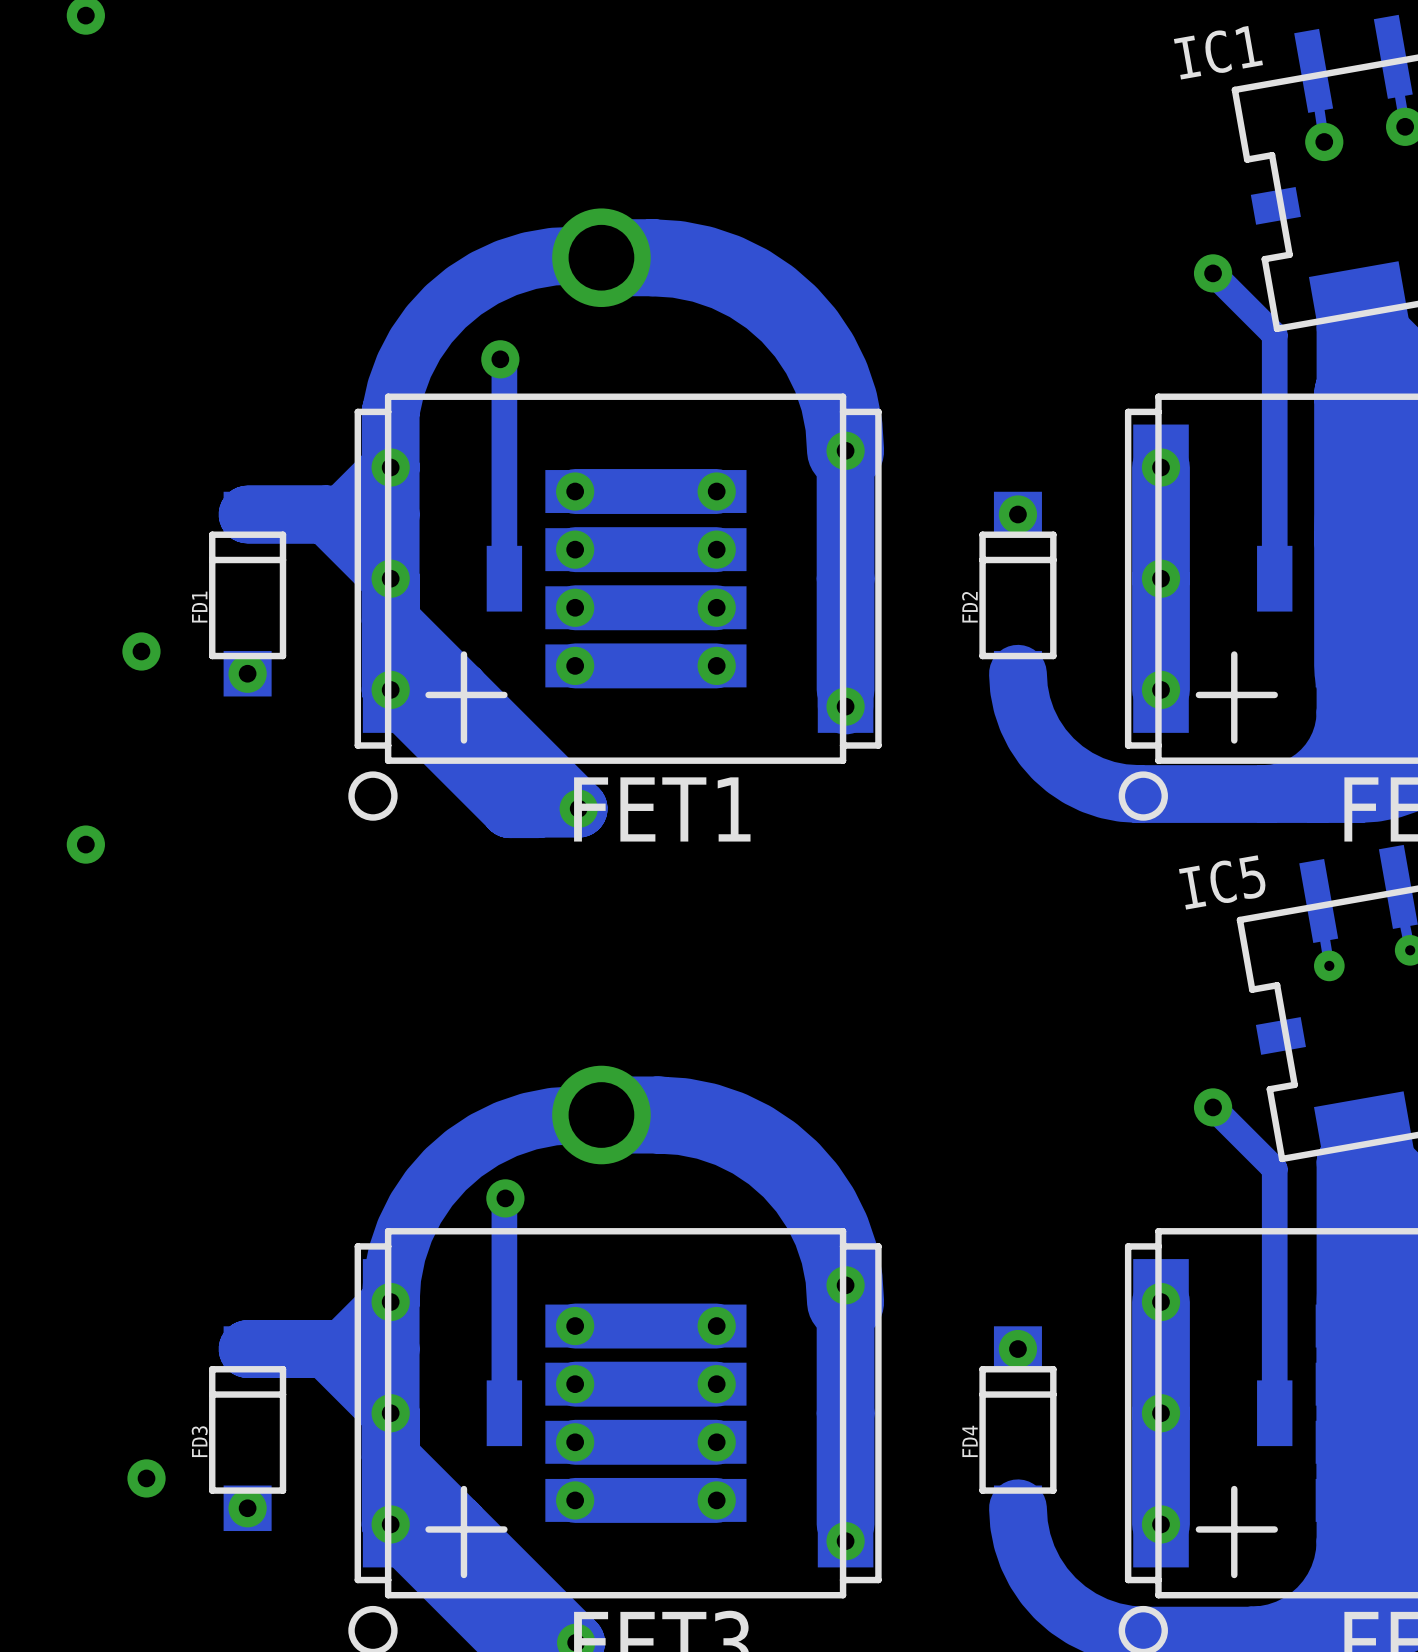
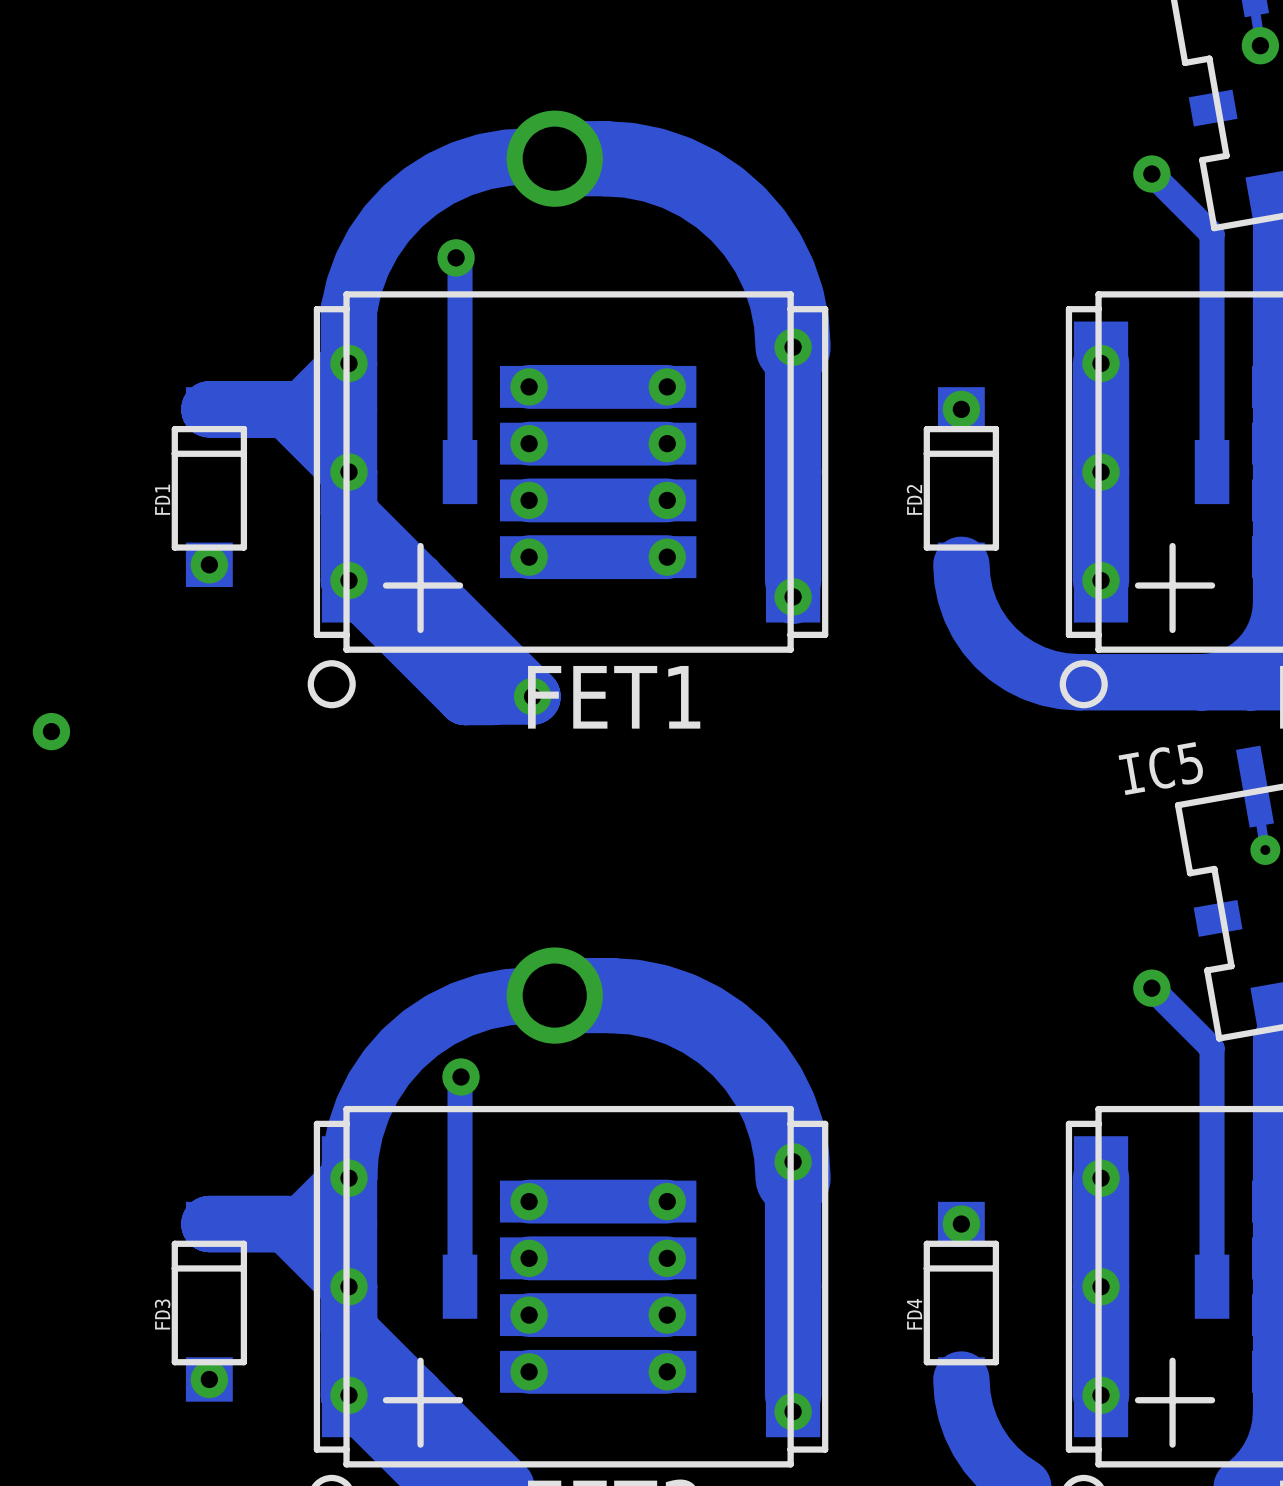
via: (141, 651) -> none
via: (146, 1478) -> none

